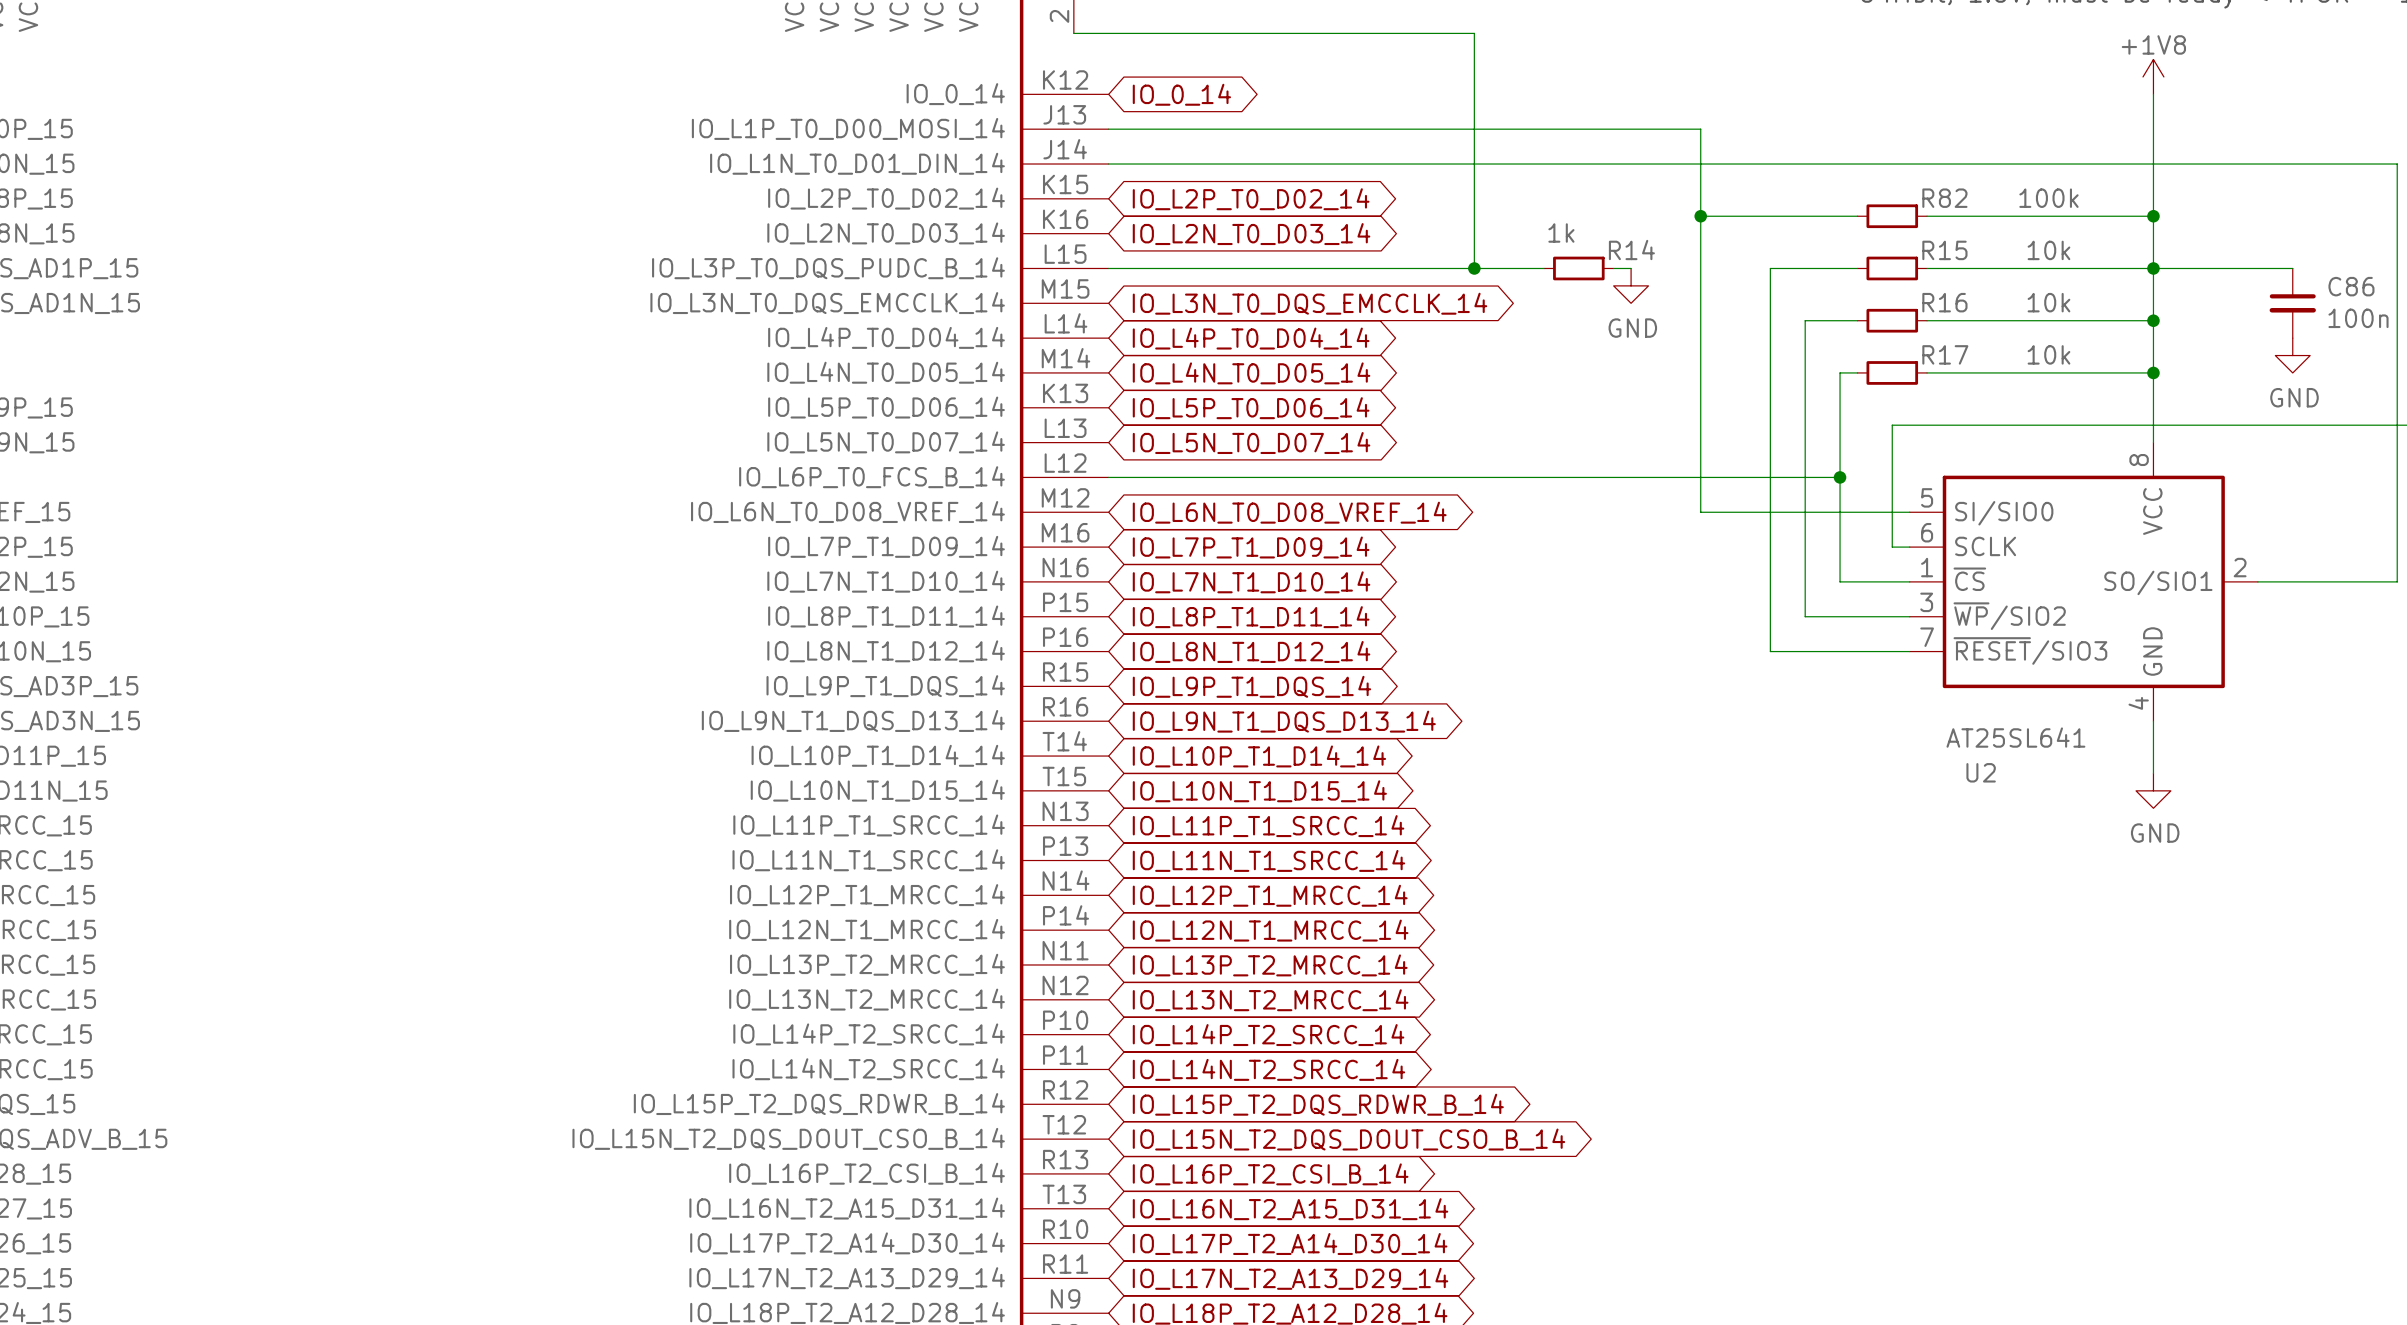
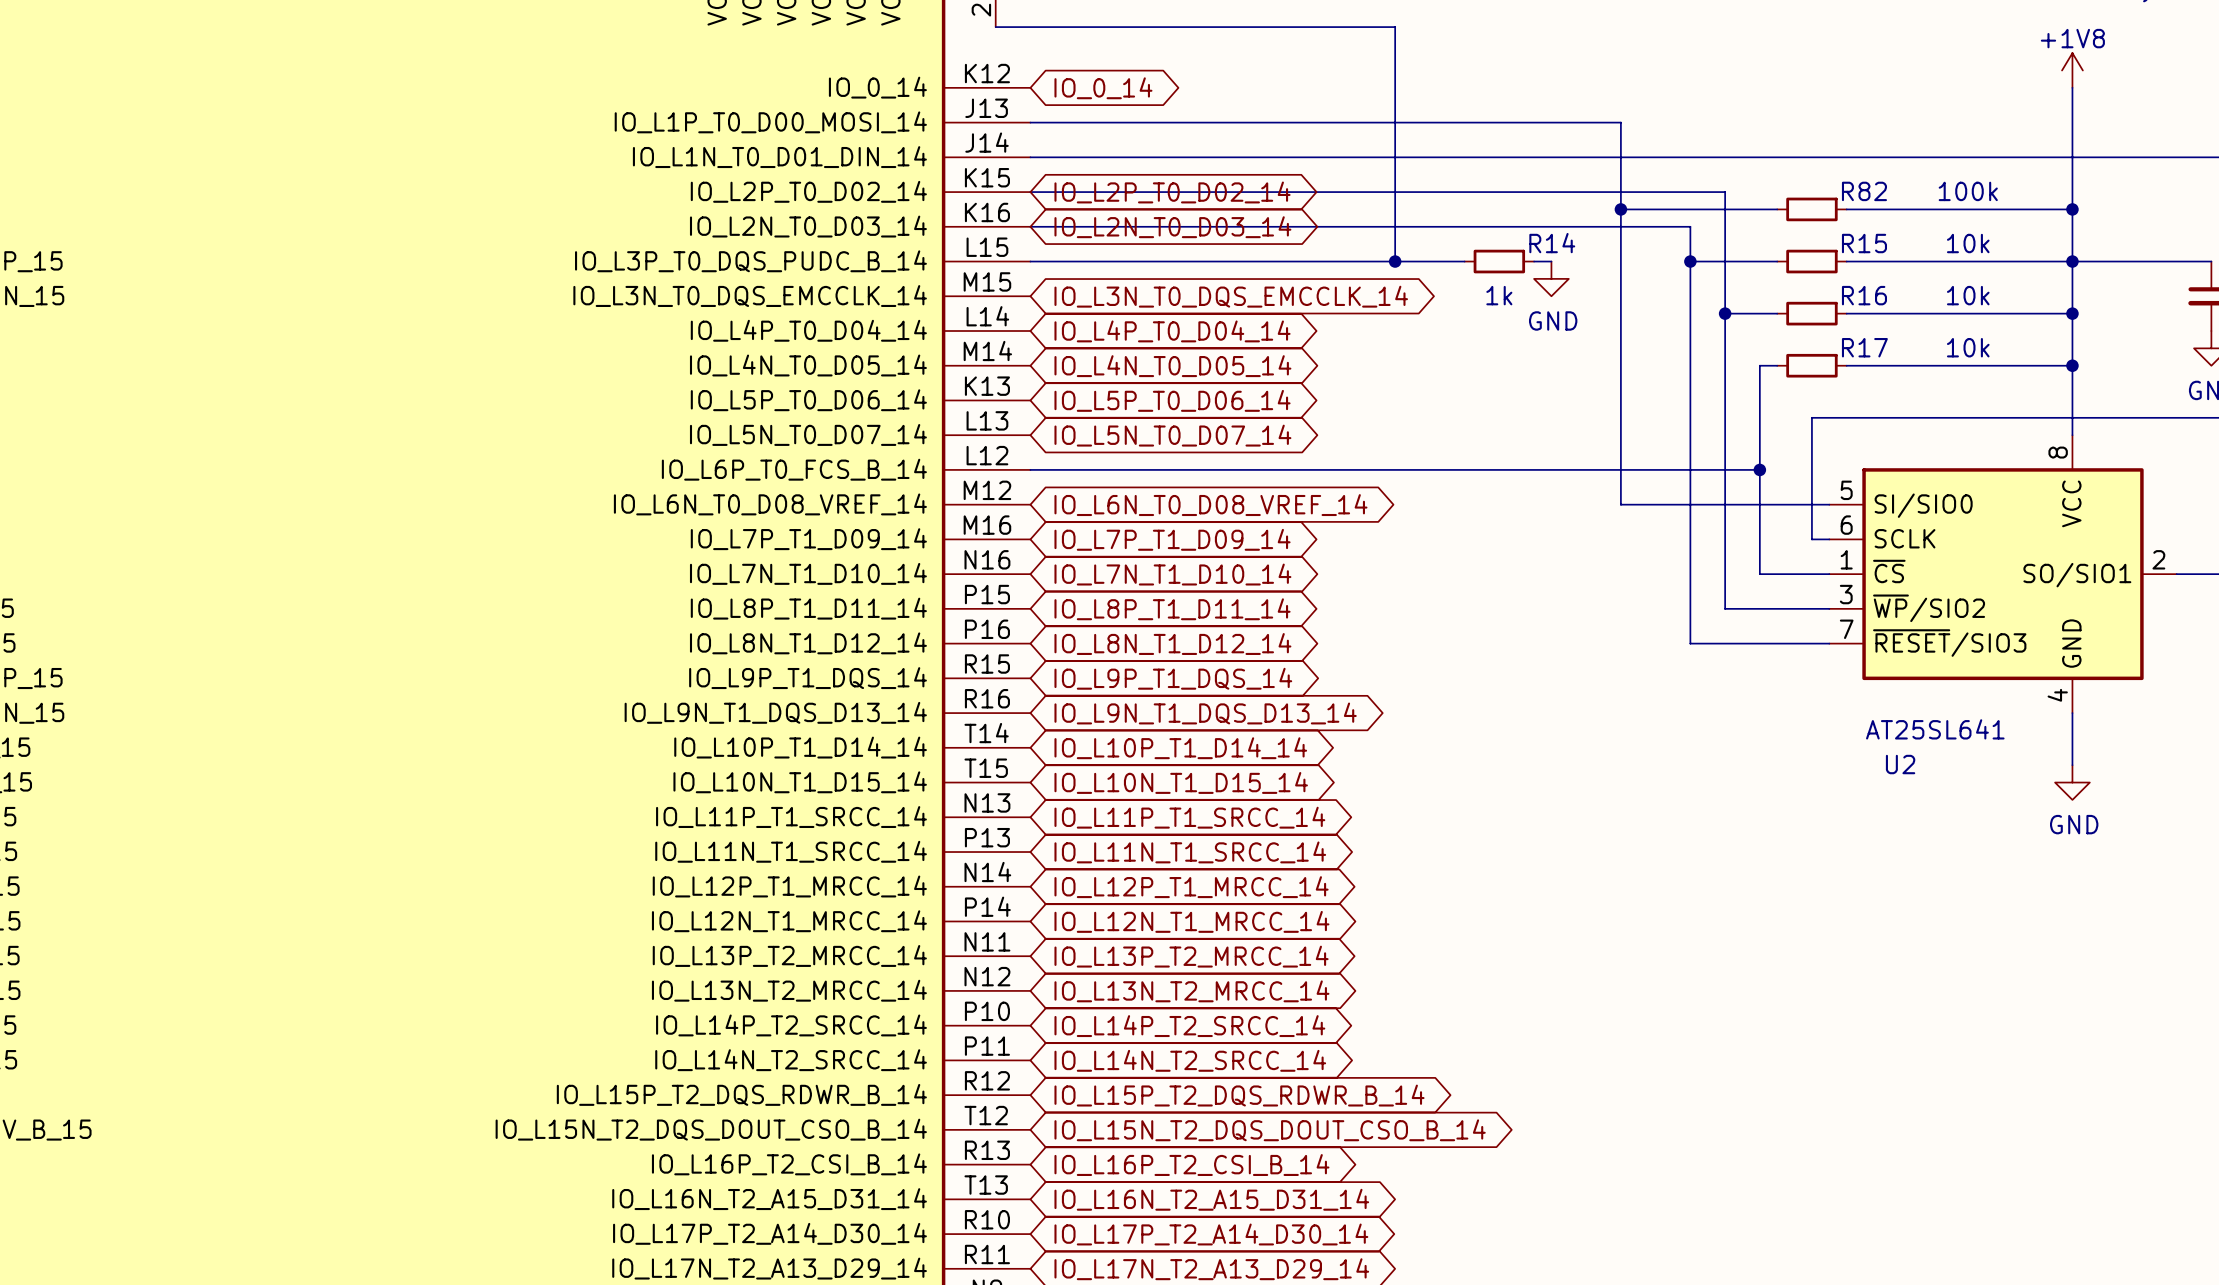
wire: none -> (1030, 192) (1725, 192) (1725, 313)
wire: none -> (1030, 226) (1690, 226) (1690, 261)
R14 value position: 1k (1561, 233) -> 1k (1499, 295)
junction: none -> (1690, 261)
junction: none -> (1725, 313)

